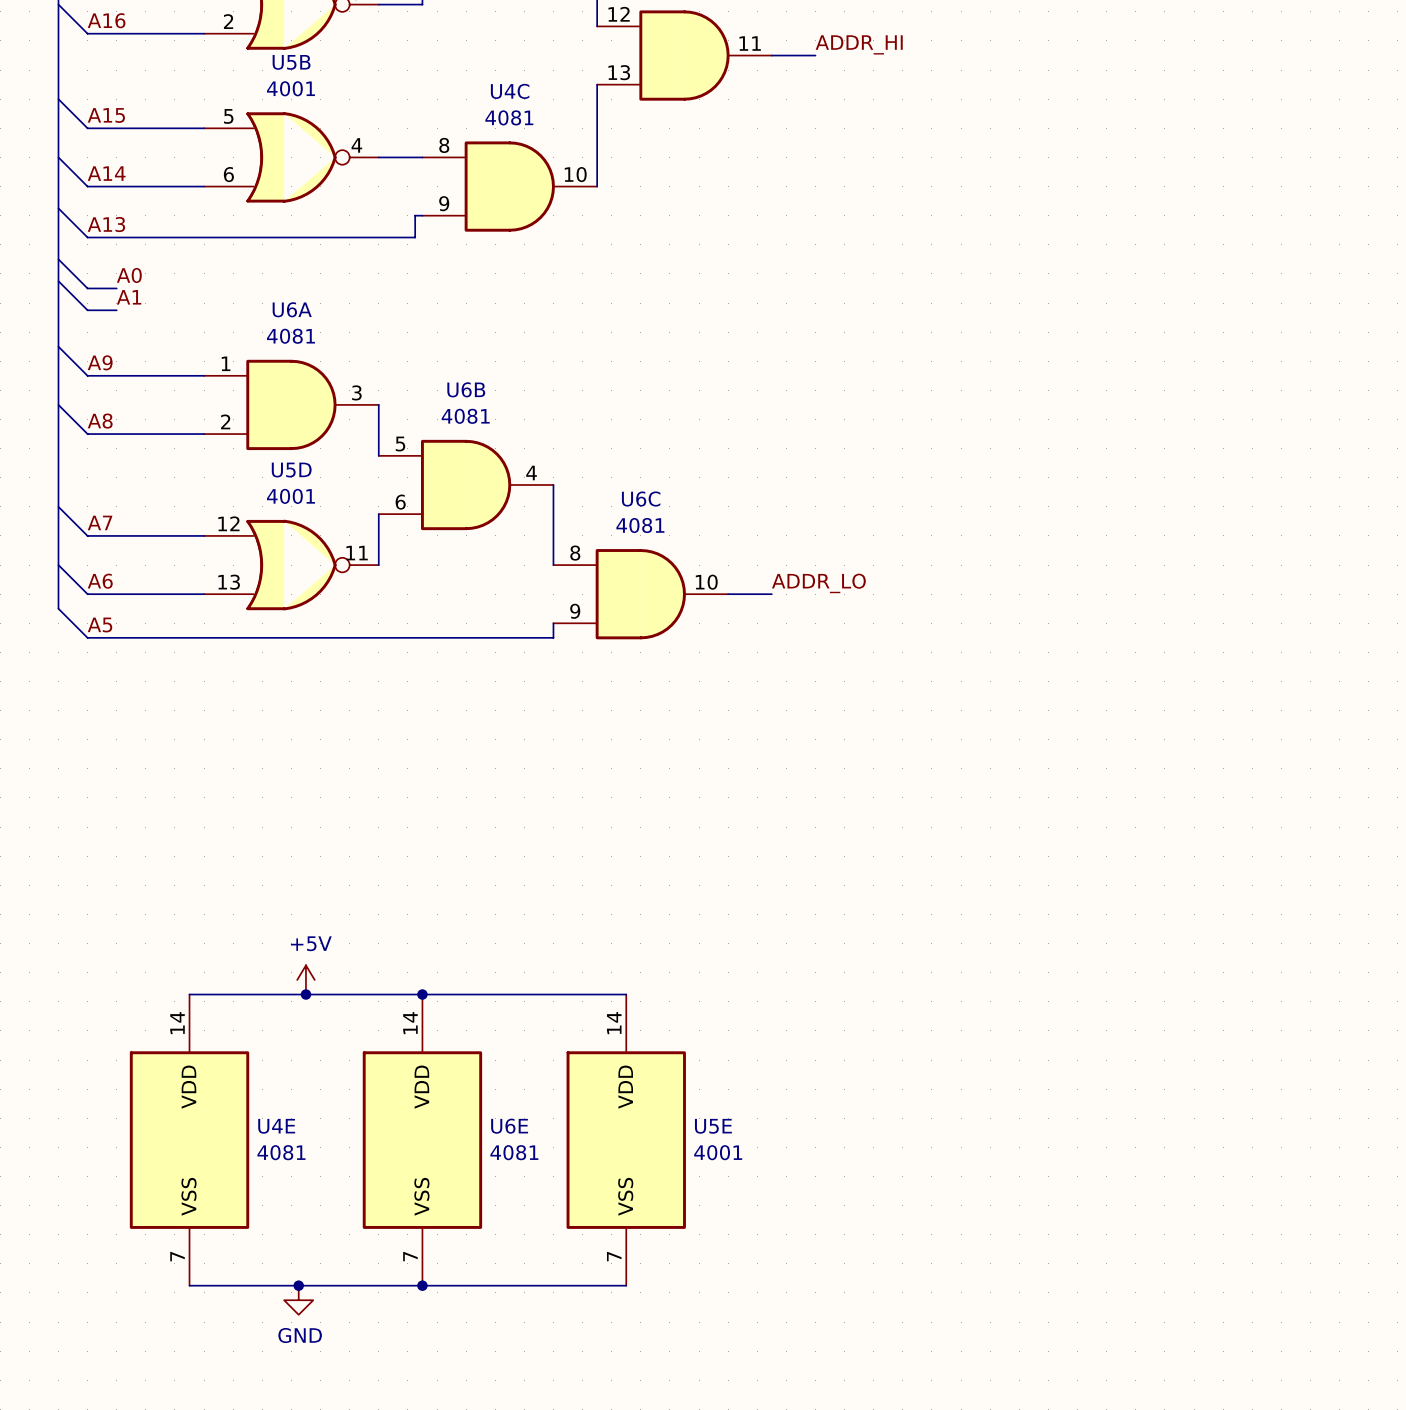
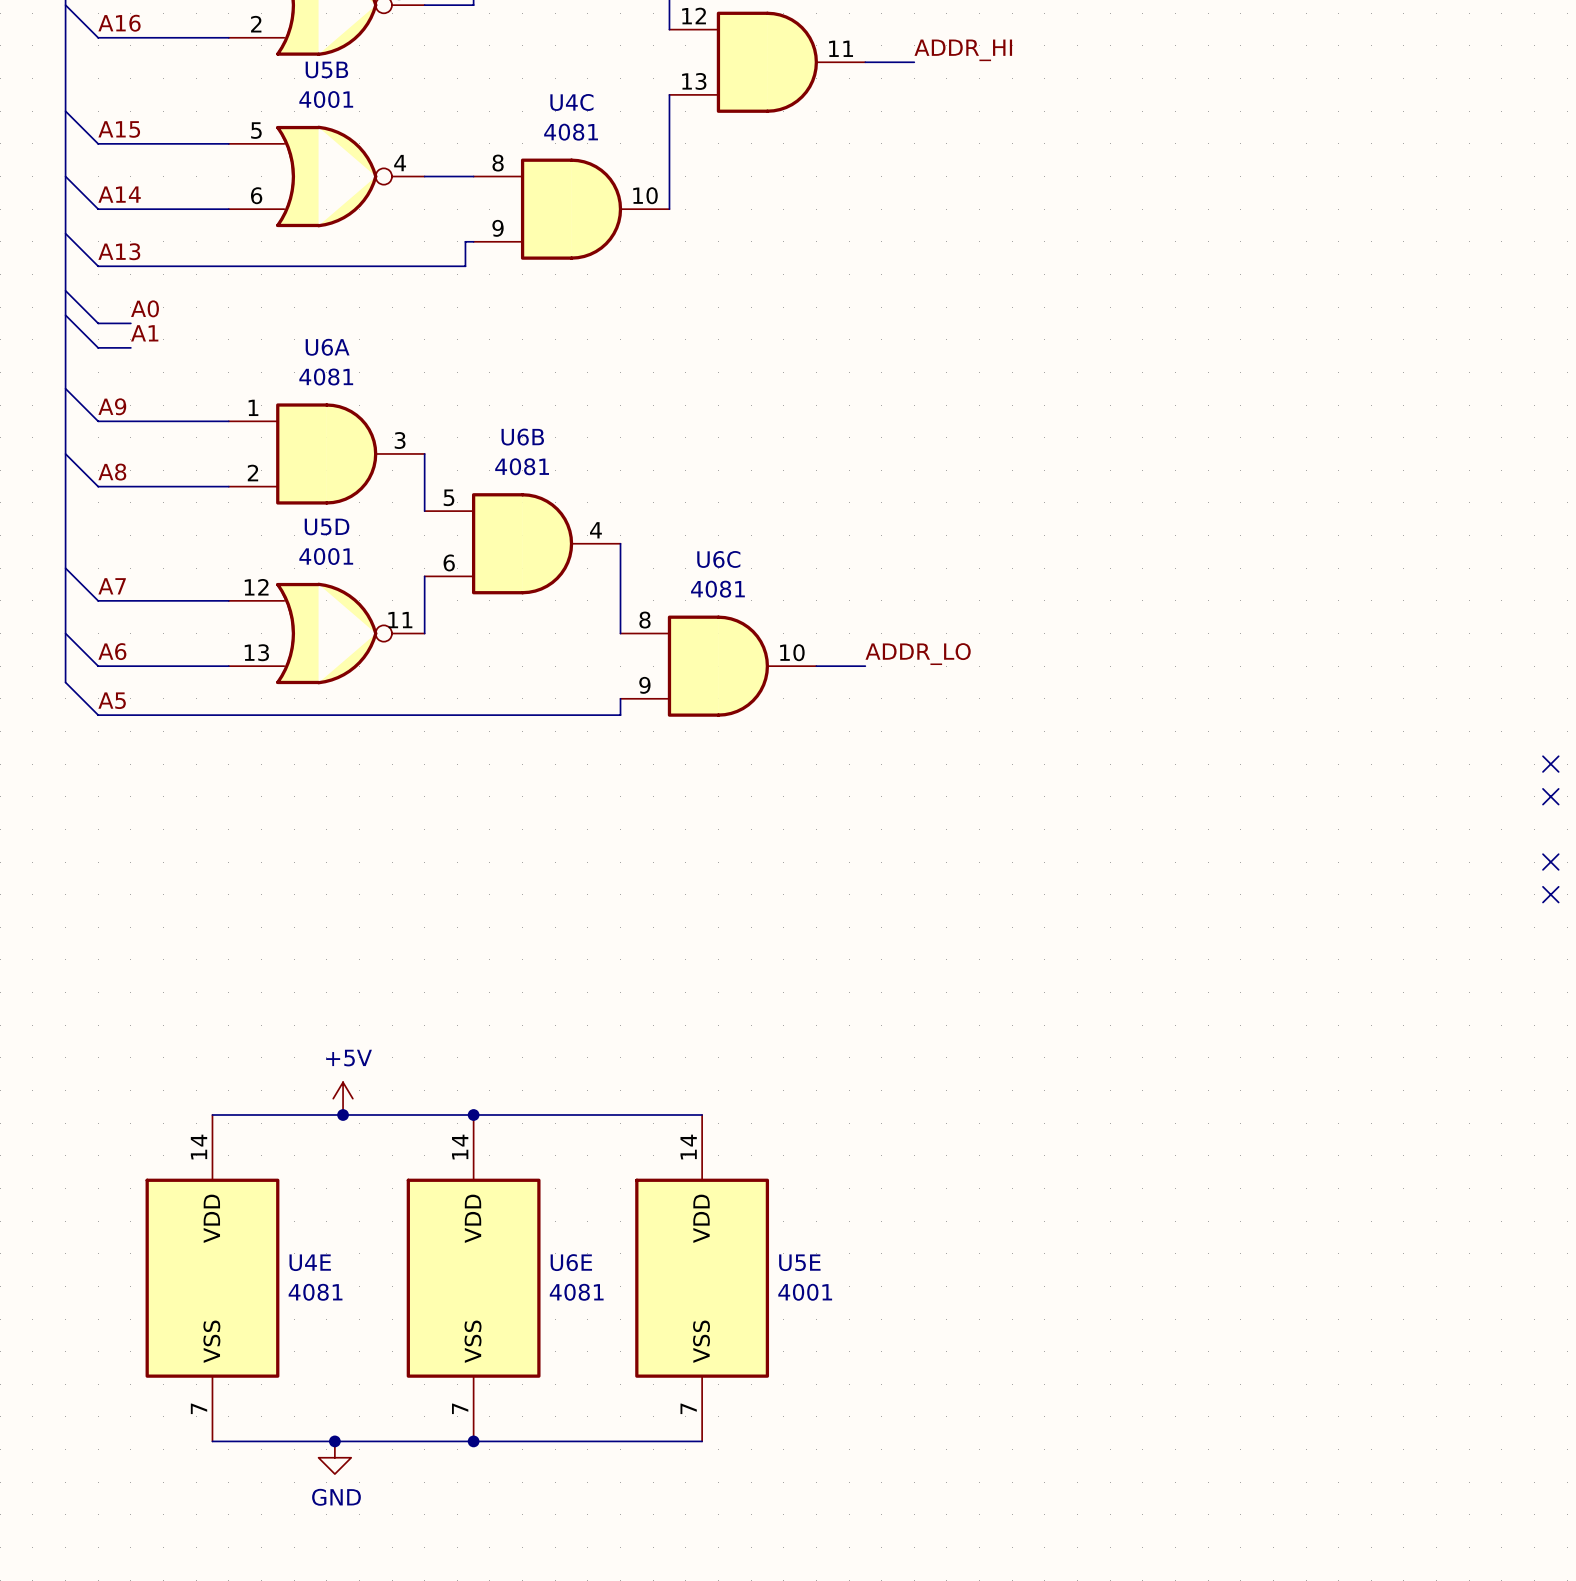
no-connect mark: none -> (1550, 764)
no-connect mark: none -> (1550, 796)
no-connect mark: none -> (1550, 862)
no-connect mark: none -> (1550, 894)

